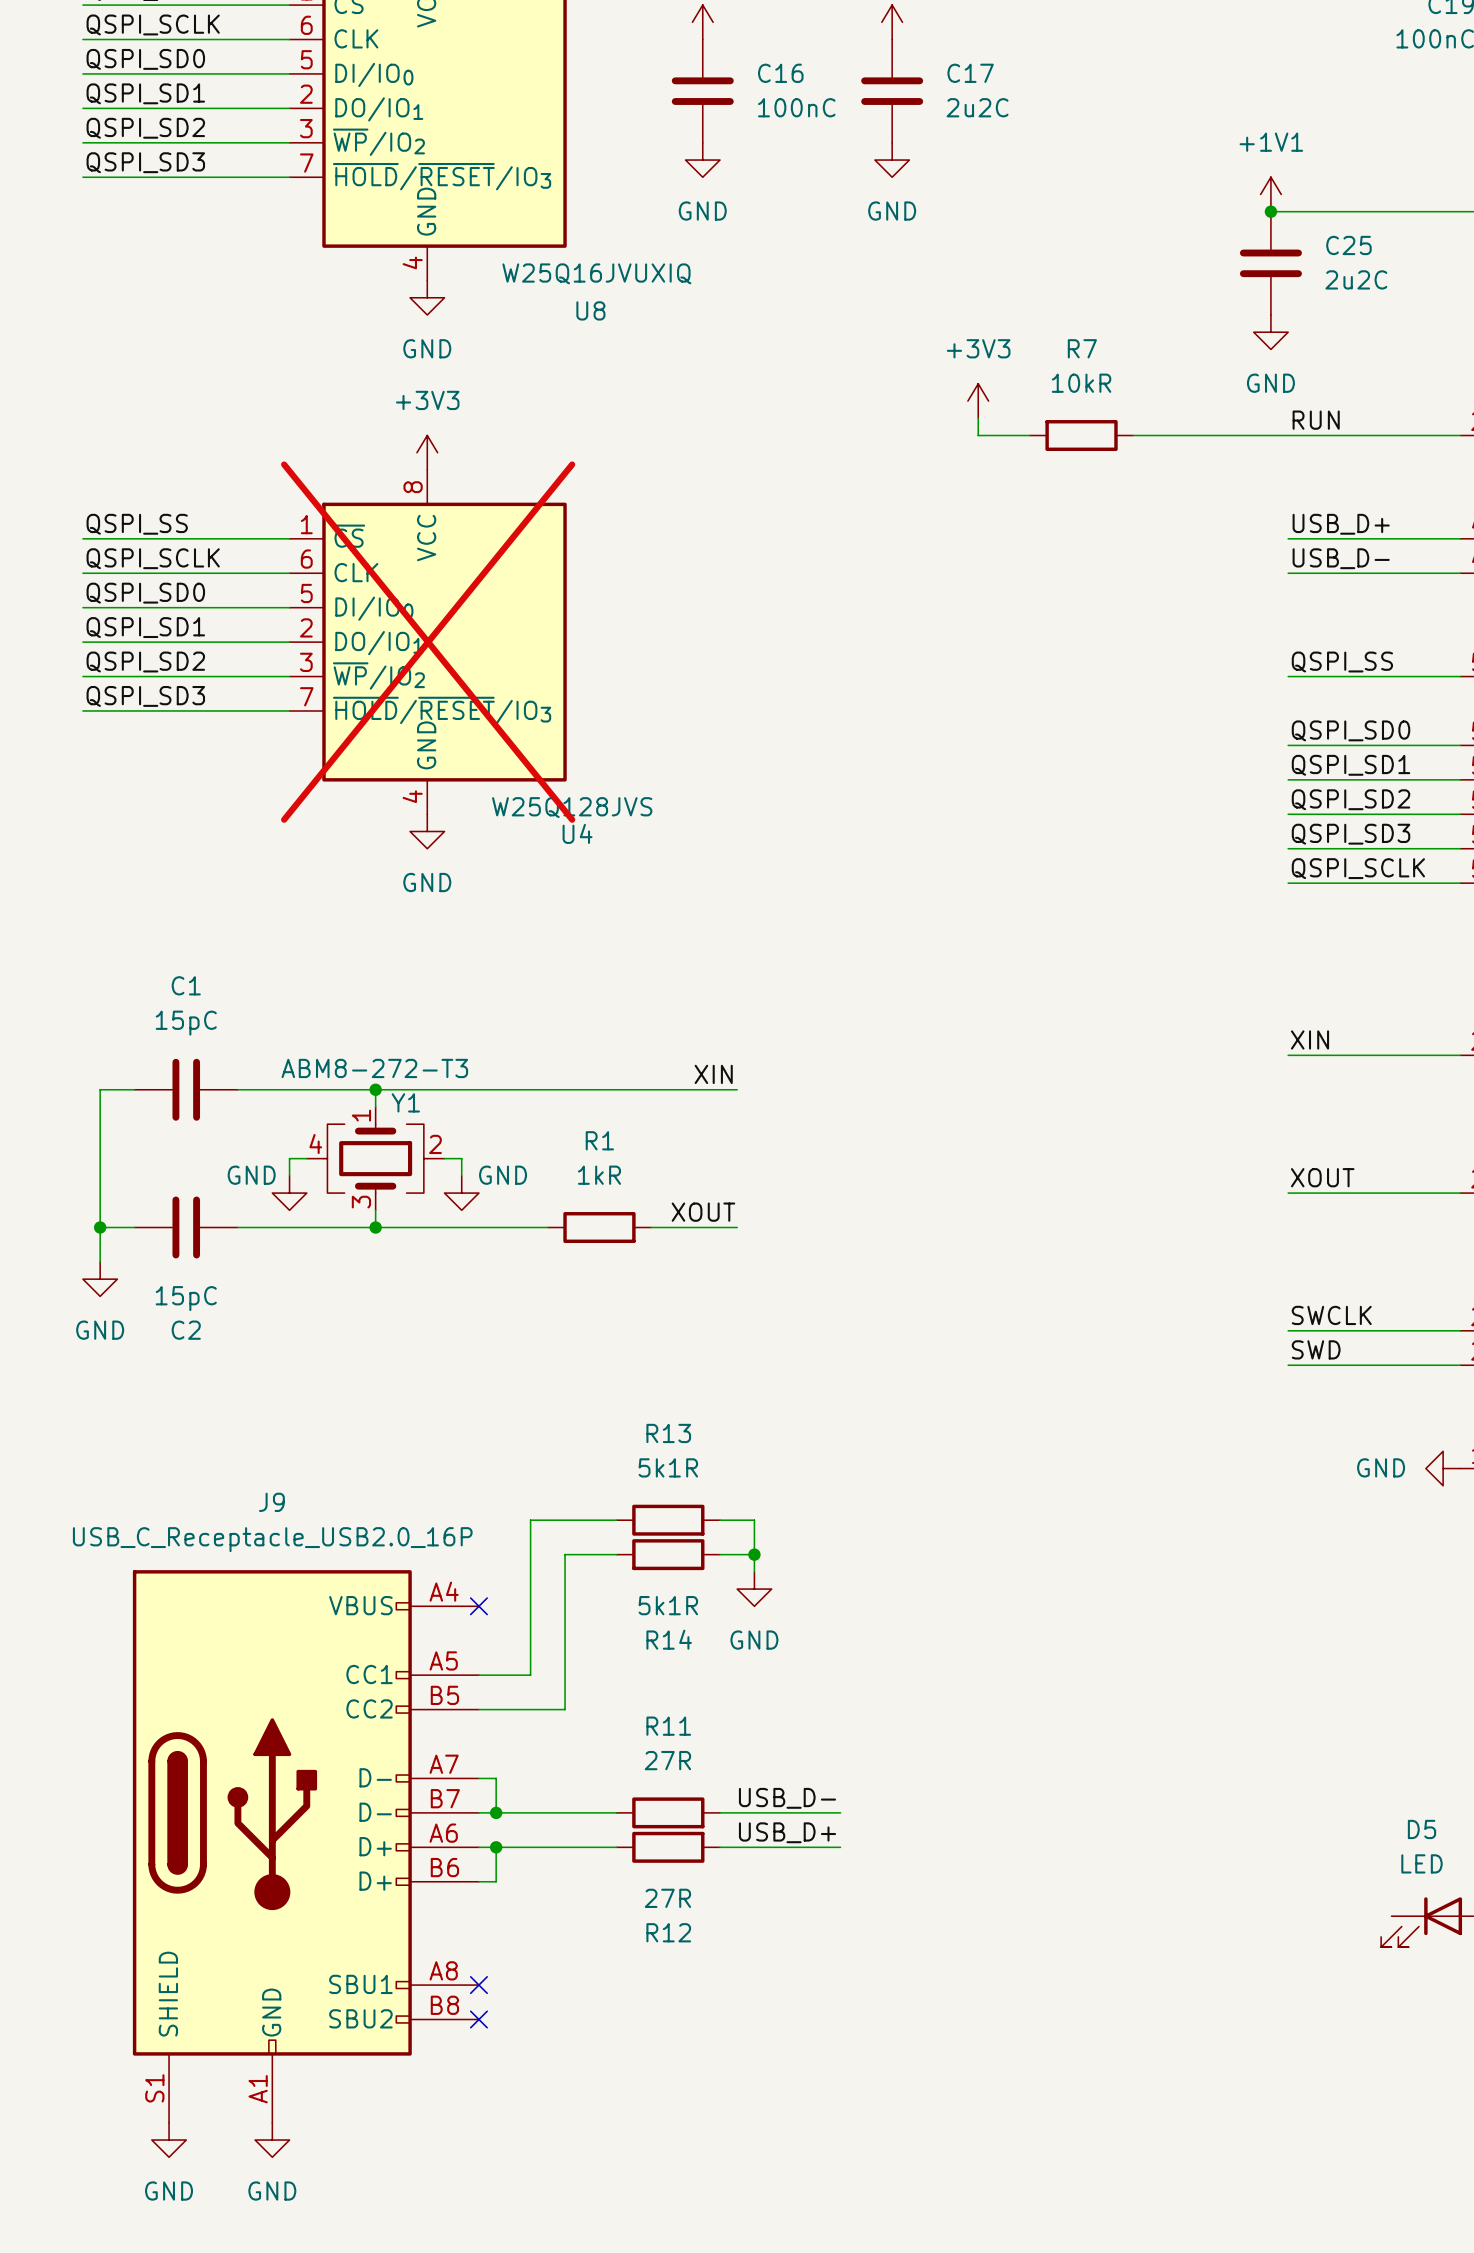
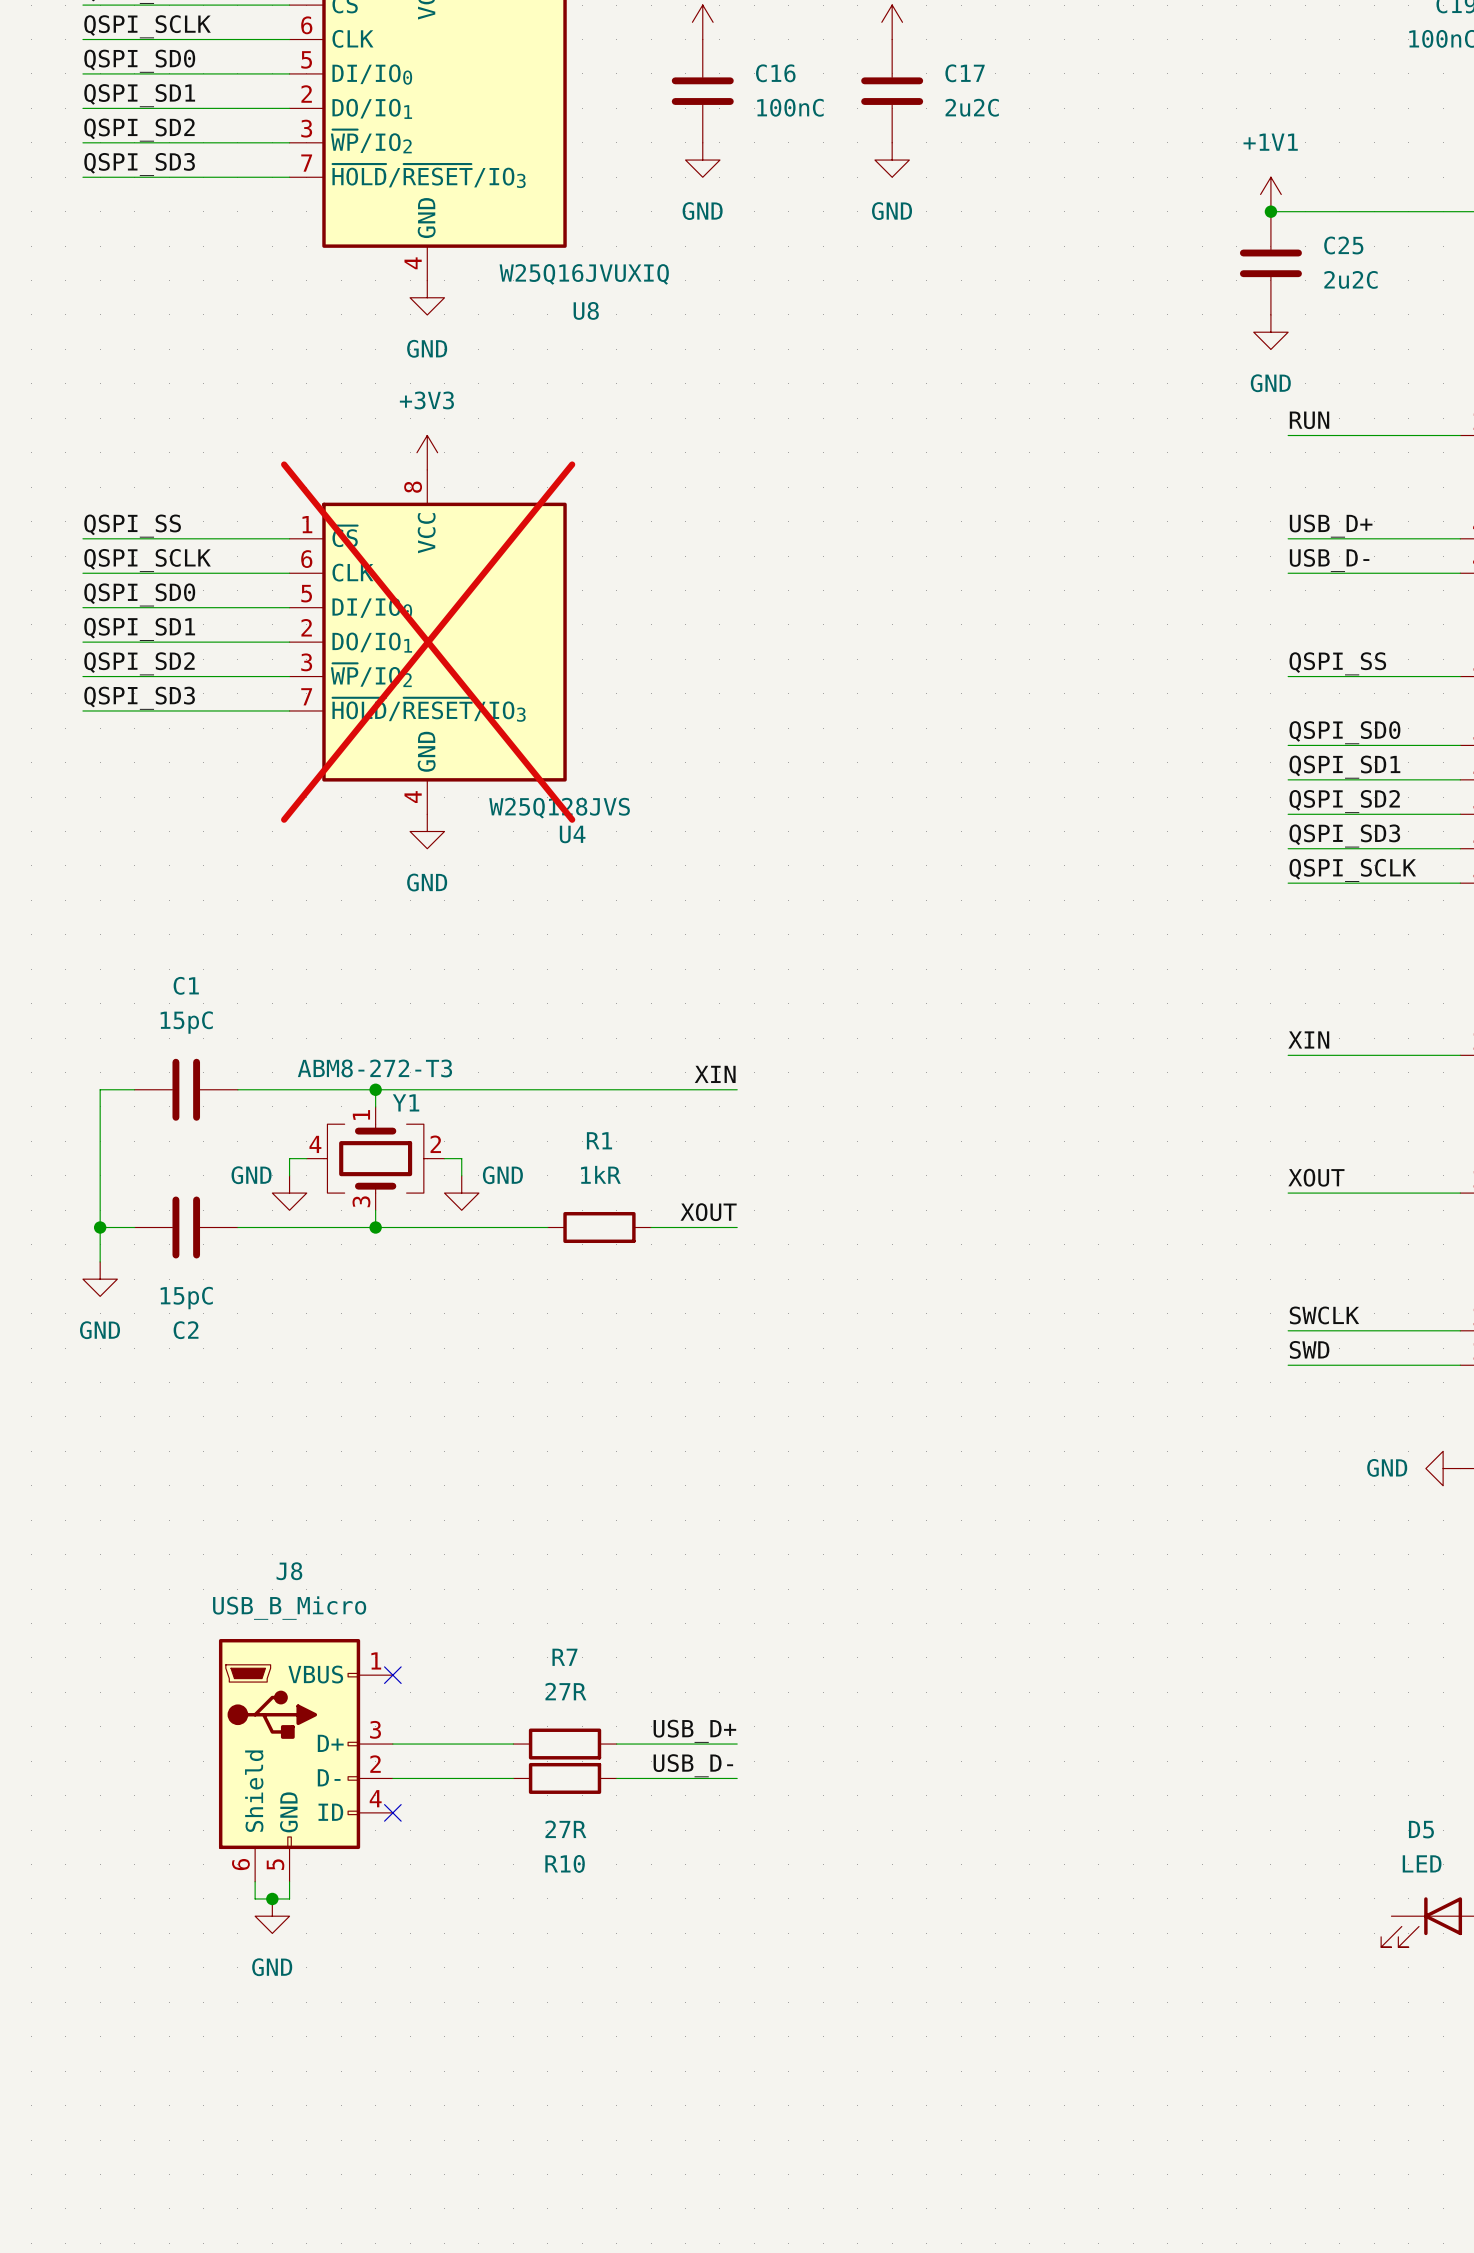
R7 value: 10kR (1081, 383) -> 27R (565, 1691)
power symbol: +3V3 (978, 401) -> none
wire: (978, 418) (978, 435) (1029, 435) -> none
R7 position: (1081, 435) -> (565, 1744)
wire: (1133, 435) (1288, 435) -> none
wire: (616, 1520) (530, 1520) (530, 1675) (478, 1675) -> none
R13: 5k1R (668, 1520) -> none
wire: (719, 1520) (754, 1520) (754, 1571) -> none
wire: (616, 1554) (565, 1554) (565, 1709) (478, 1709) -> none
R14: 5k1R (668, 1554) -> none
wire: (719, 1554) (754, 1554) -> none
junction: (754, 1554) -> none
power symbol: GND (754, 1589) -> none
no-connect mark: (478, 1606) -> none
no-connect mark: none -> (392, 1675)
wire: none -> (392, 1744) (513, 1744)
J8: none -> USB_B_Micro (305, 1760)
wire: (496, 1778) (496, 1812) -> (496, 1778) (513, 1778)
R10: none -> 27R (565, 1778)
label position: USB_D- (787, 1798) -> USB_D- (693, 1765)
no-connect mark: none -> (392, 1812)
wire: (478, 1812) (616, 1812) -> none
junction: (496, 1812) -> none
R11: 27R (668, 1812) -> none
wire: (719, 1812) (840, 1812) -> (616, 1744) (737, 1744)
label position: USB_D+ (787, 1832) -> USB_D+ (694, 1731)
J9: USB_C_Receptacle_USB2.0_16P (305, 1846) -> none
wire: (478, 1847) (616, 1847) -> none
wire: (496, 1847) (496, 1881) (478, 1881) -> none
junction: (496, 1847) -> none
R12: 27R (668, 1847) -> none
wire: (719, 1847) (840, 1847) -> (616, 1778) (737, 1778)
junction: none -> (272, 1898)
power symbol: none -> GND (272, 1916)
no-connect mark: (478, 1985) -> none
no-connect mark: (478, 2019) -> none
power symbol: GND (169, 2140) -> none
power symbol: GND (272, 2140) -> none

